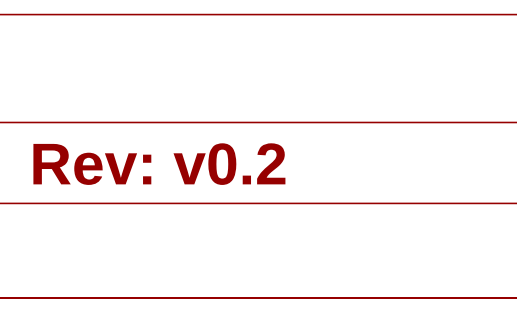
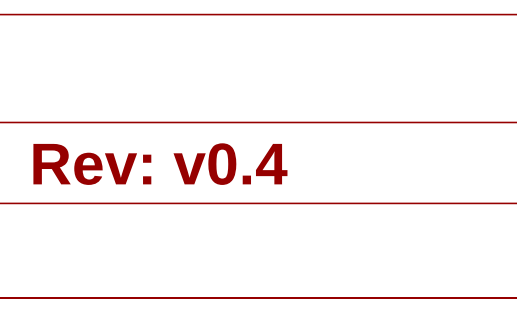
title block: Rev: v0.2 (159, 164) -> Rev: v0.4 (160, 164)

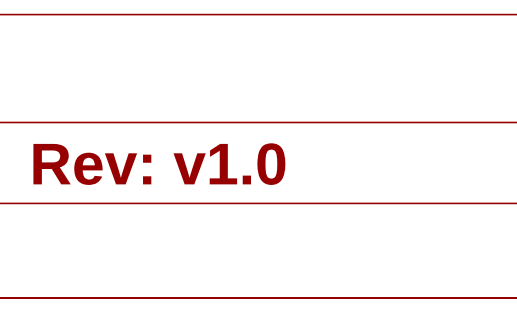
title block: Rev: v0.4 (160, 164) -> Rev: v1.0 (159, 164)

